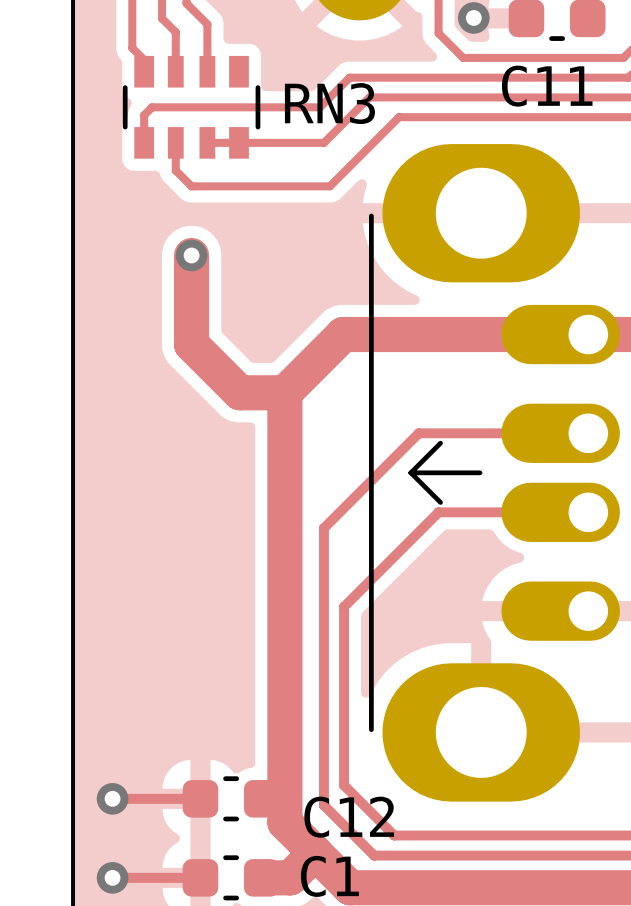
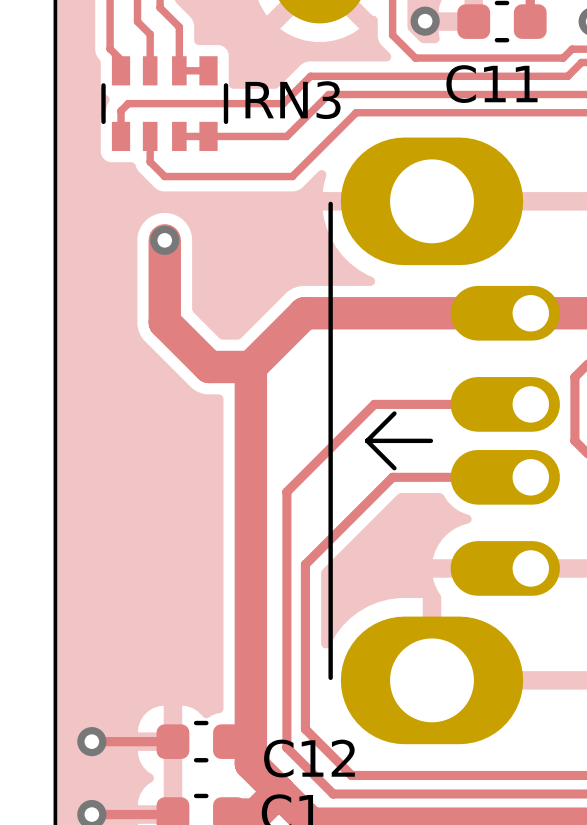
track: none -> (179, 70) (208, 70)

